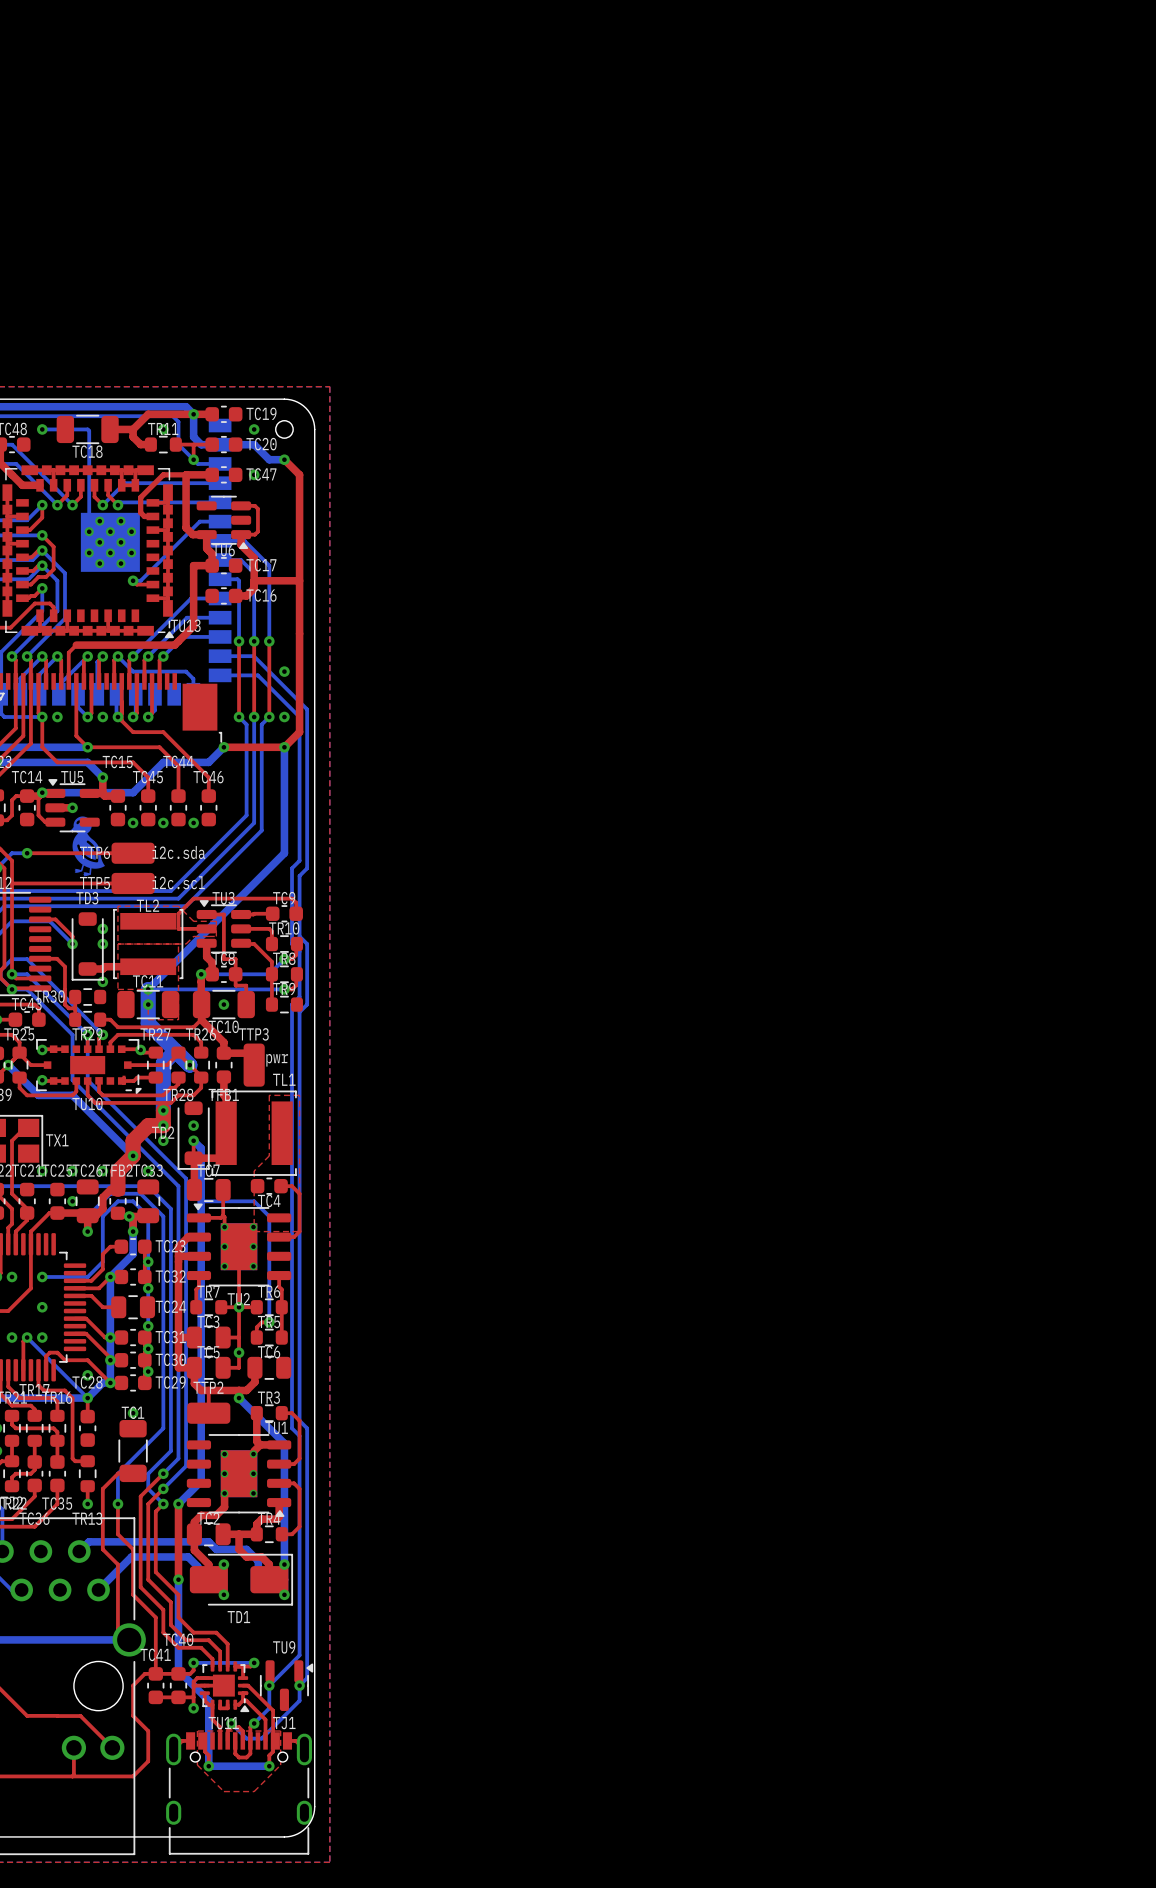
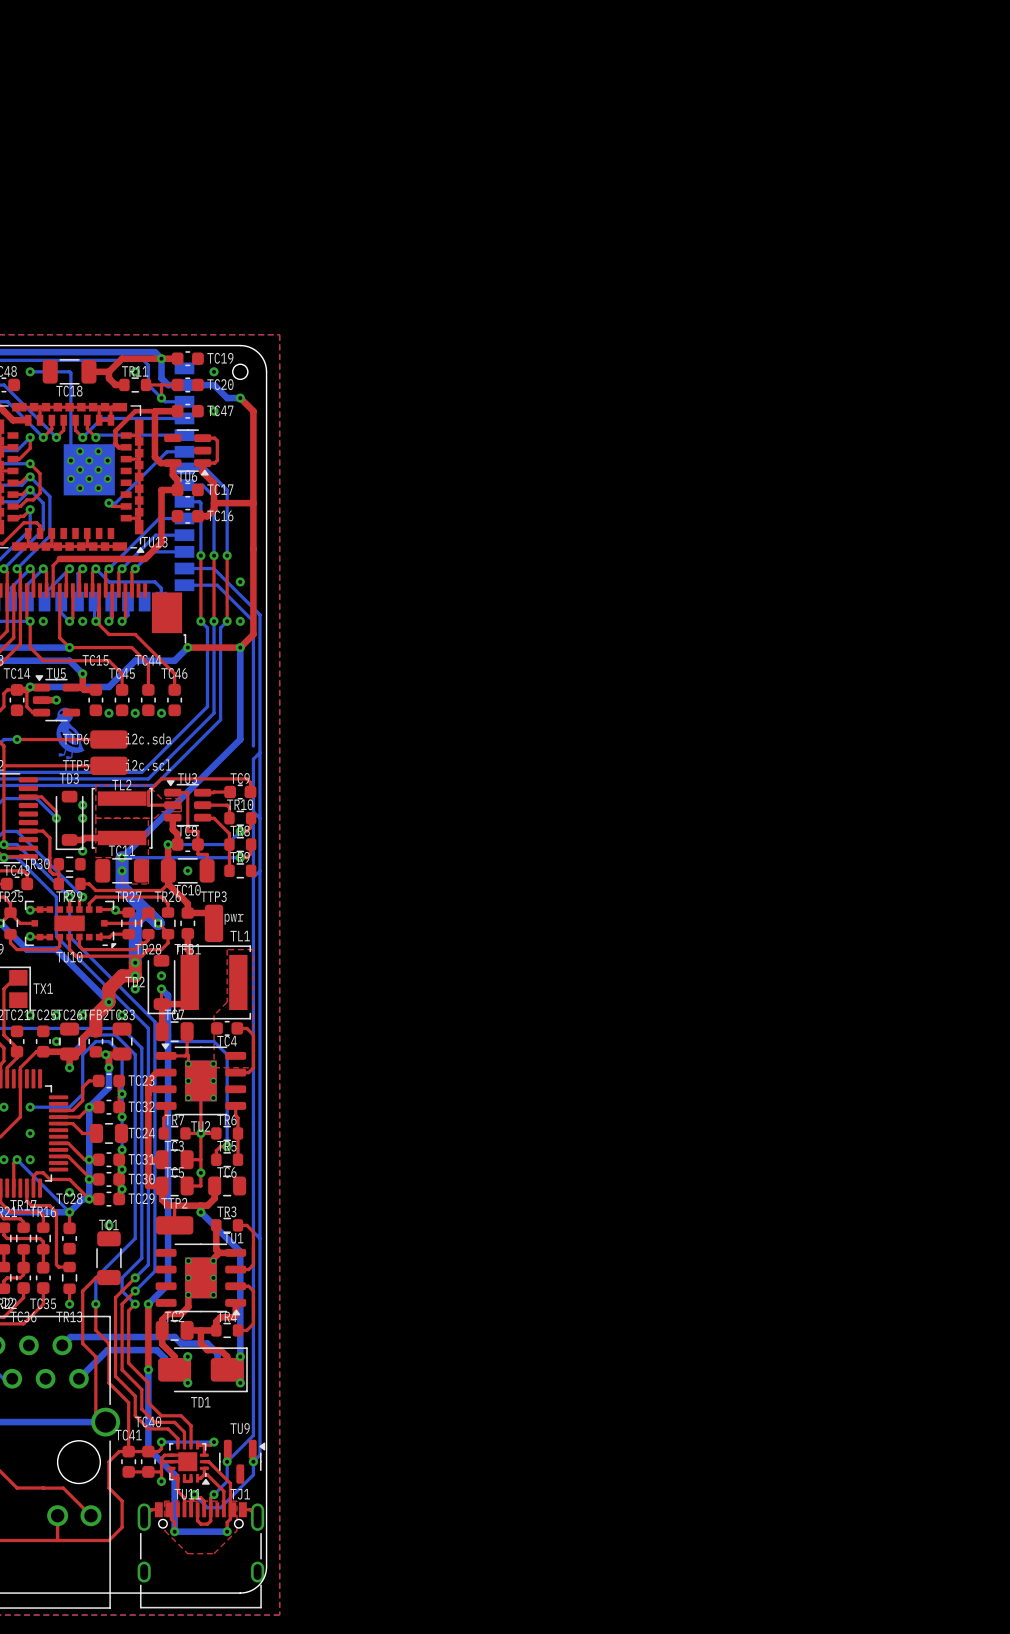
bottom track: (299, 860) (292, 868) (292, 944) (299, 951) -> none
bottom track: none -> (259, 752) (259, 818)
bottom track: (299, 996) (292, 1004) (292, 1428) (299, 1435) -> none
bottom track: none -> (259, 870) (259, 1238)

